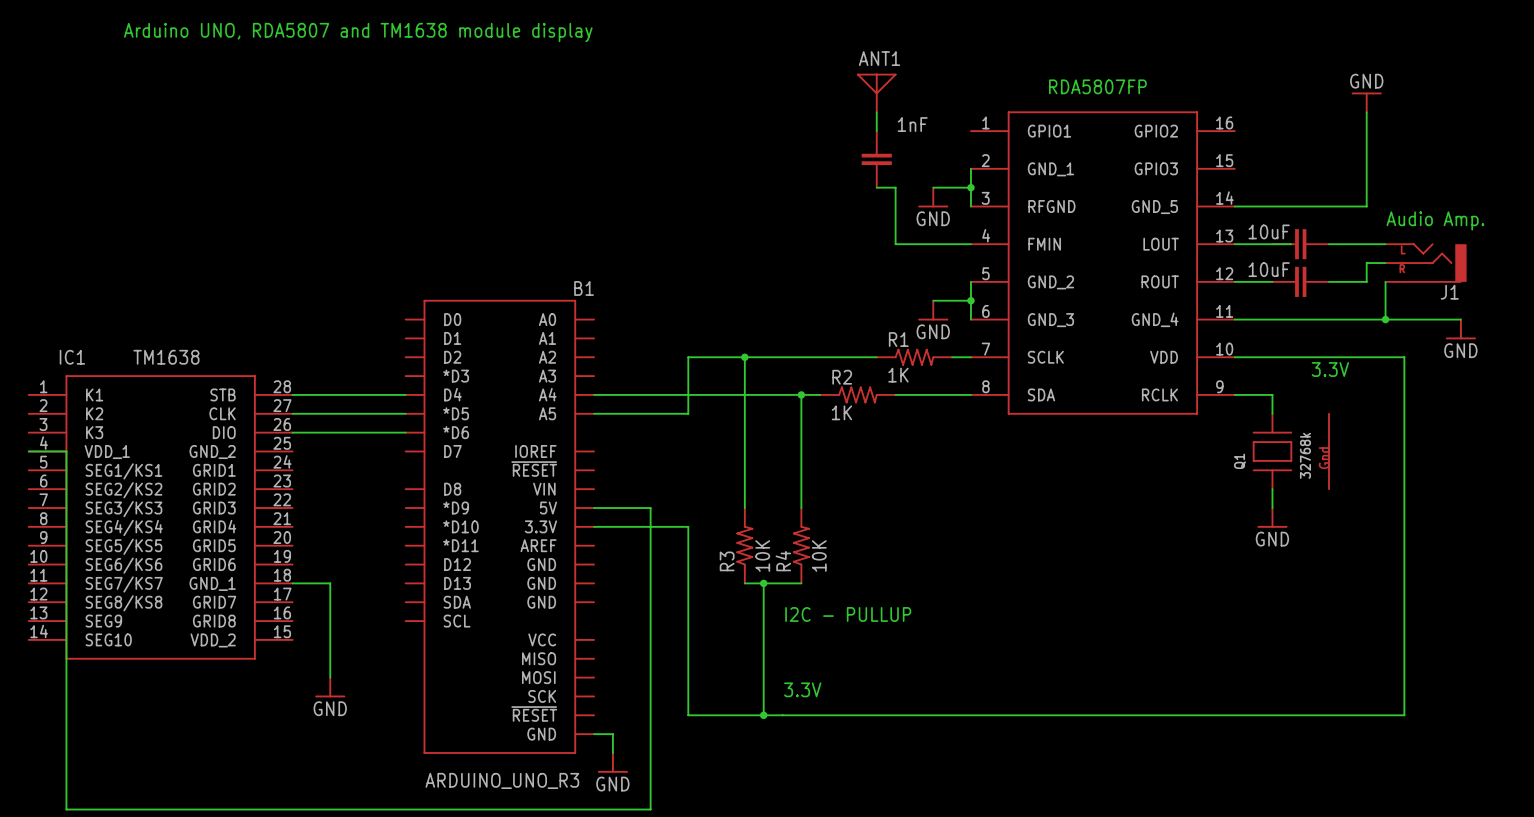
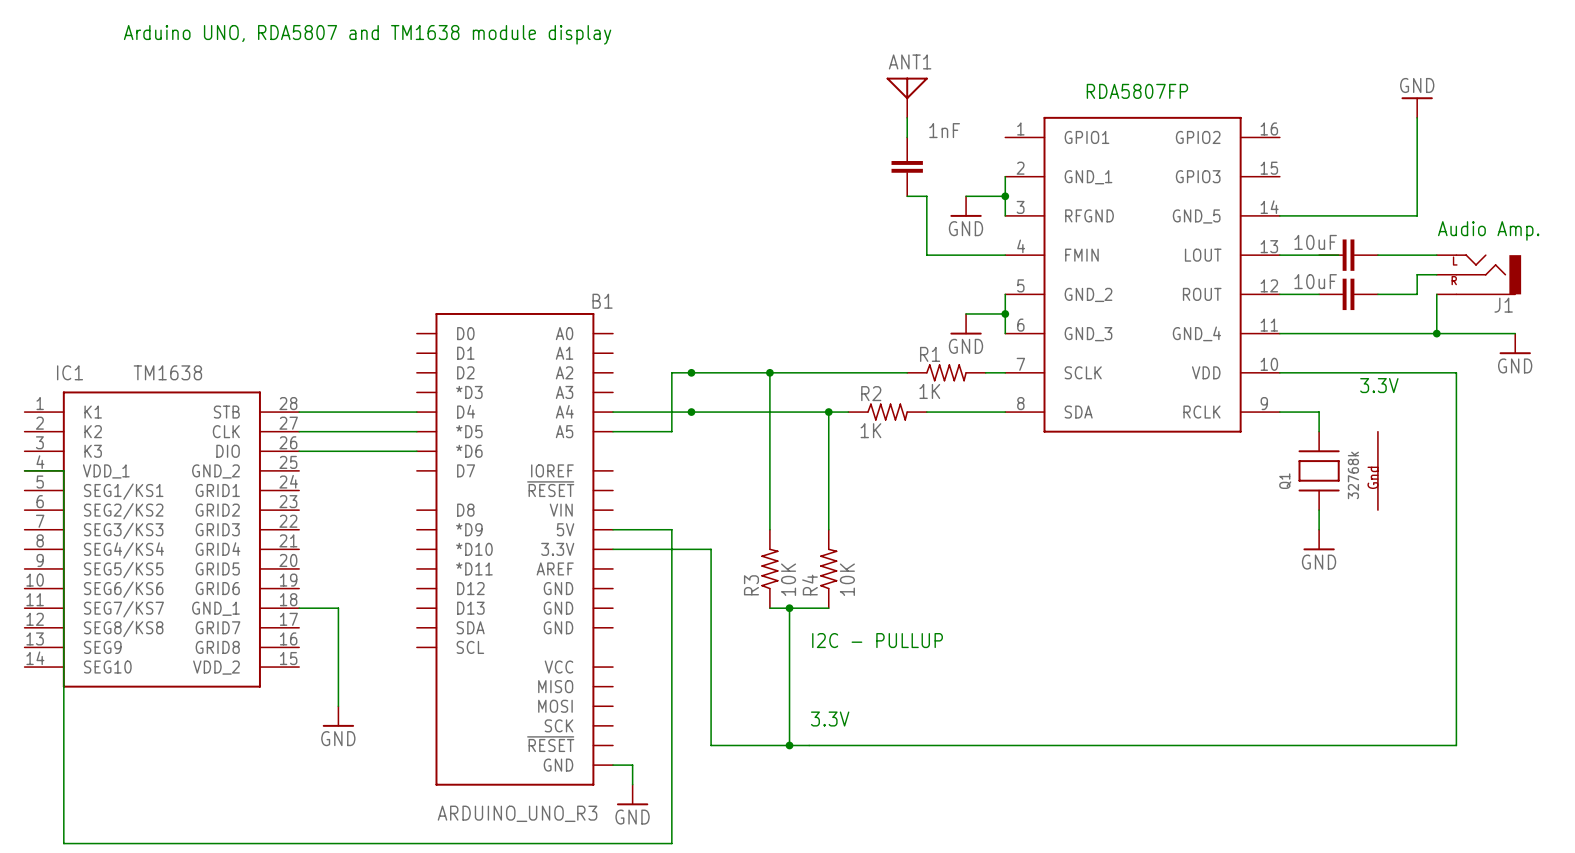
junction: none -> (691, 372)
wire: (688, 357) (688, 413) (650, 413) -> (711, 372) (671, 372) (671, 431)
junction: none -> (691, 412)

